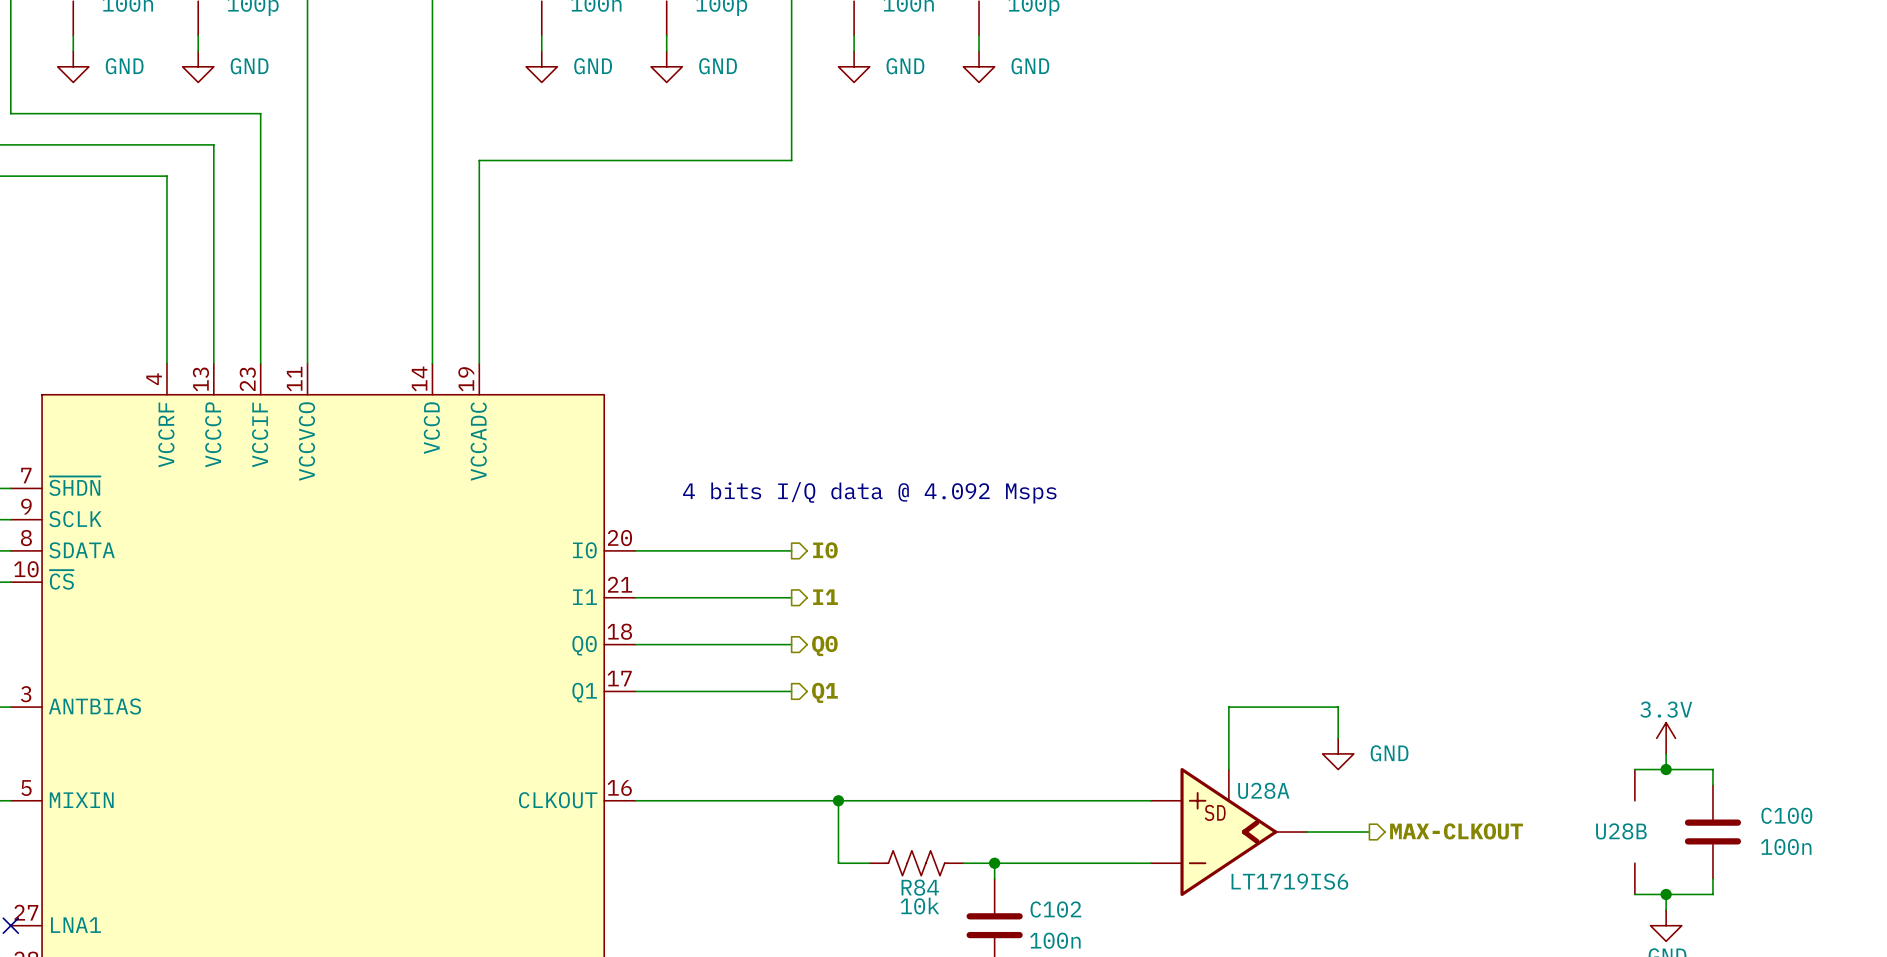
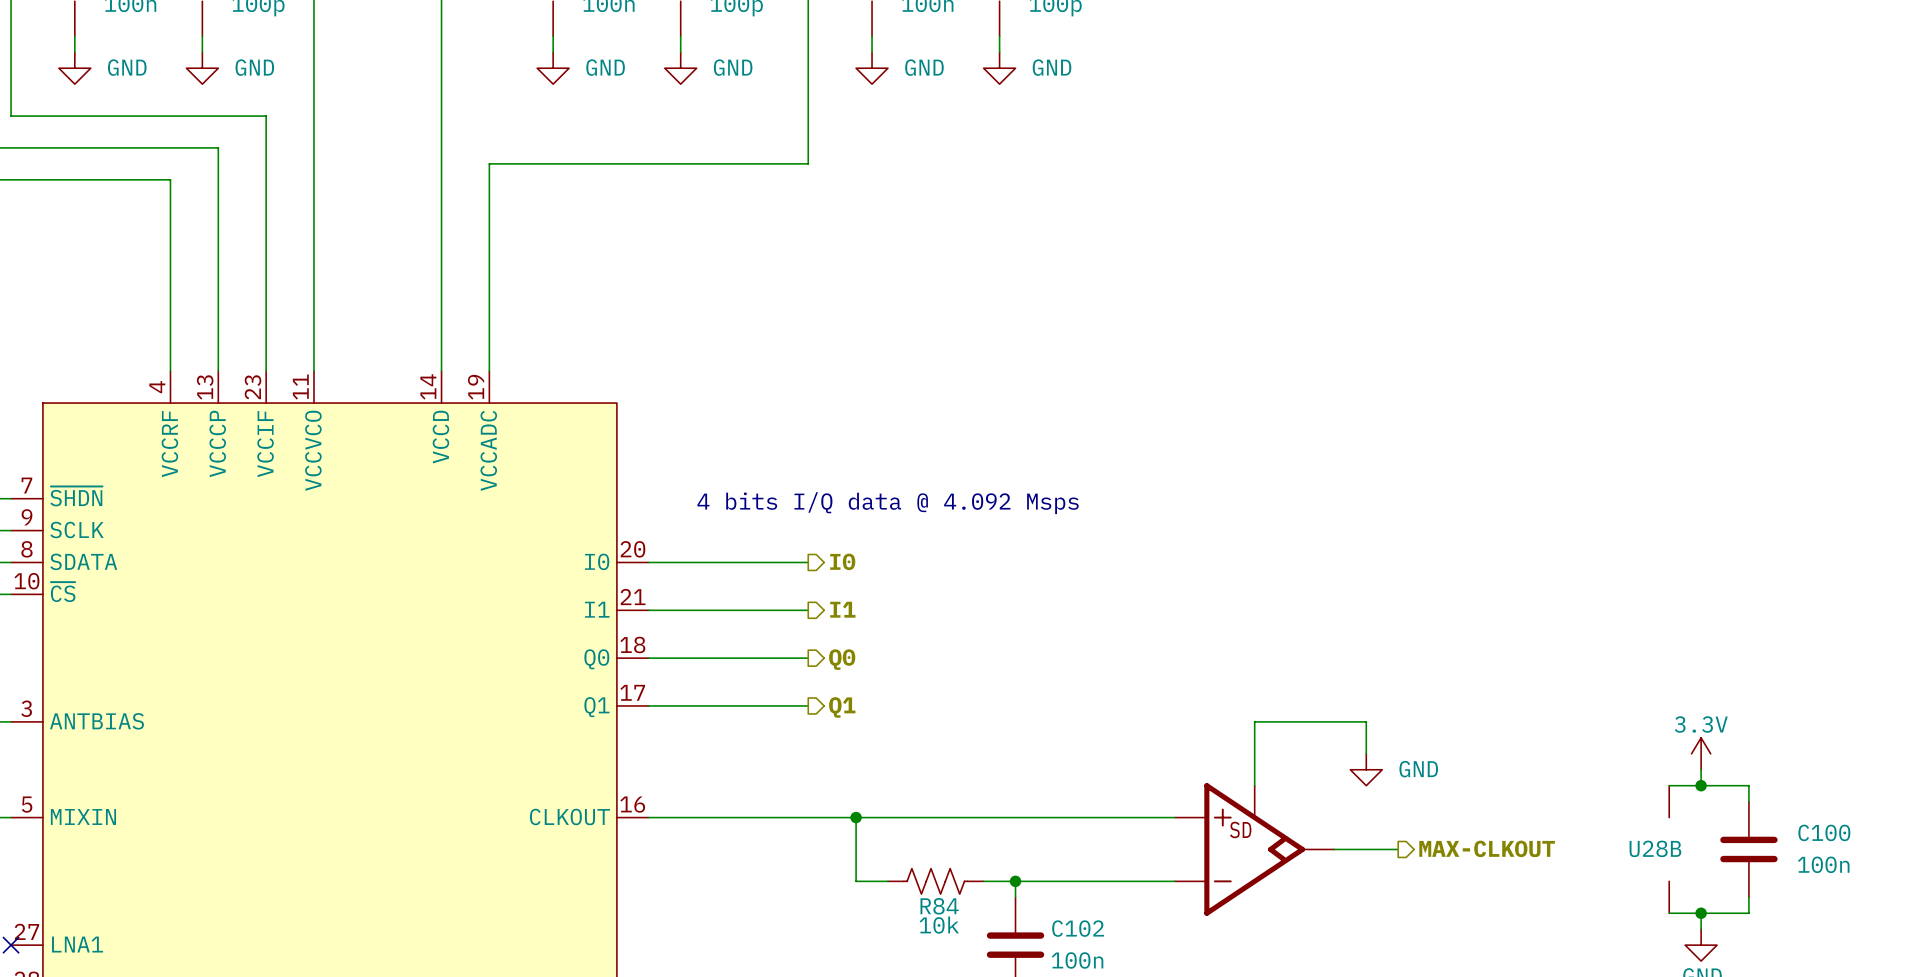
U28A: LT1719IS6 (1228, 832) -> none
part: none -> (1254, 849)

